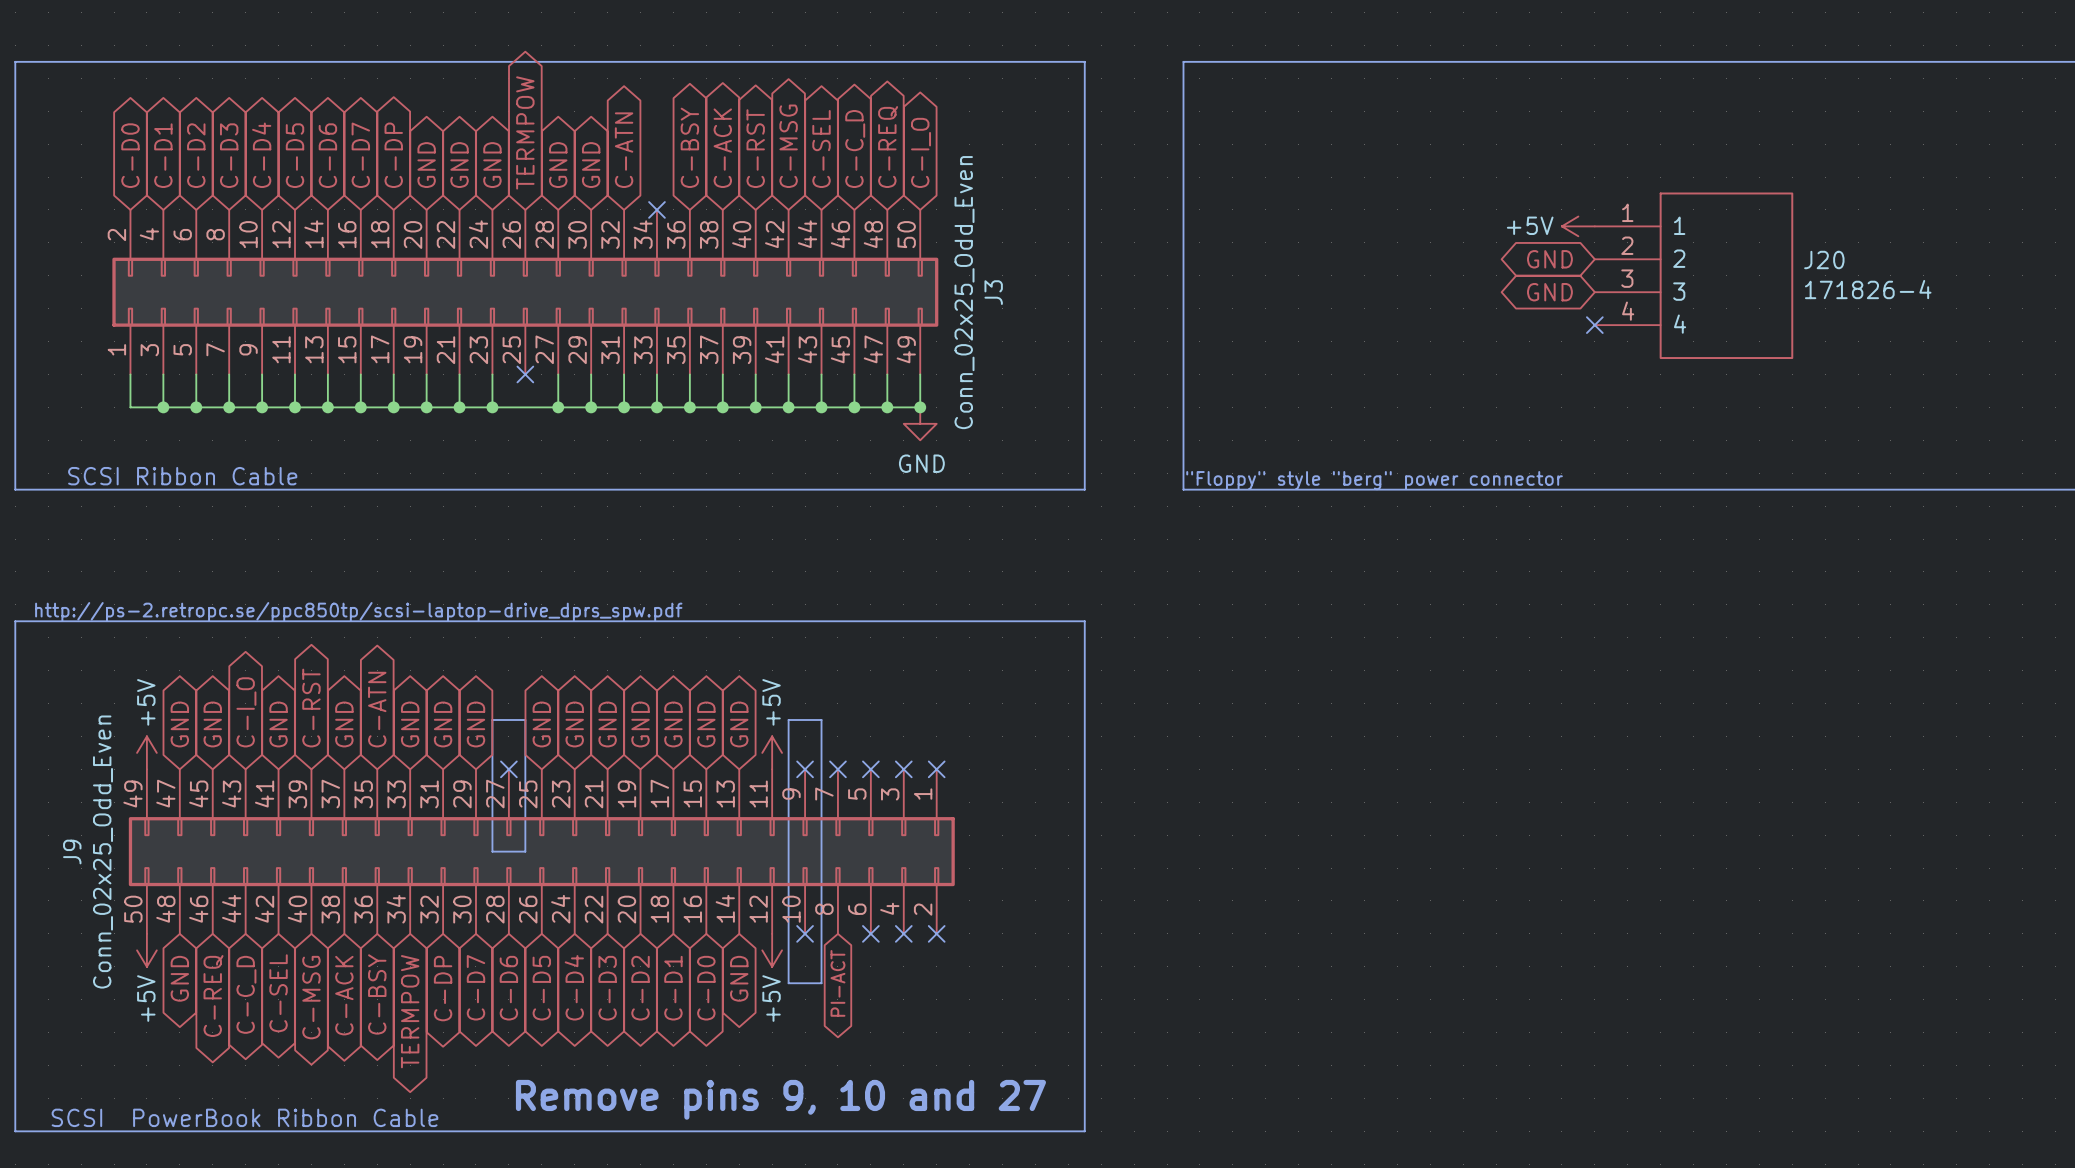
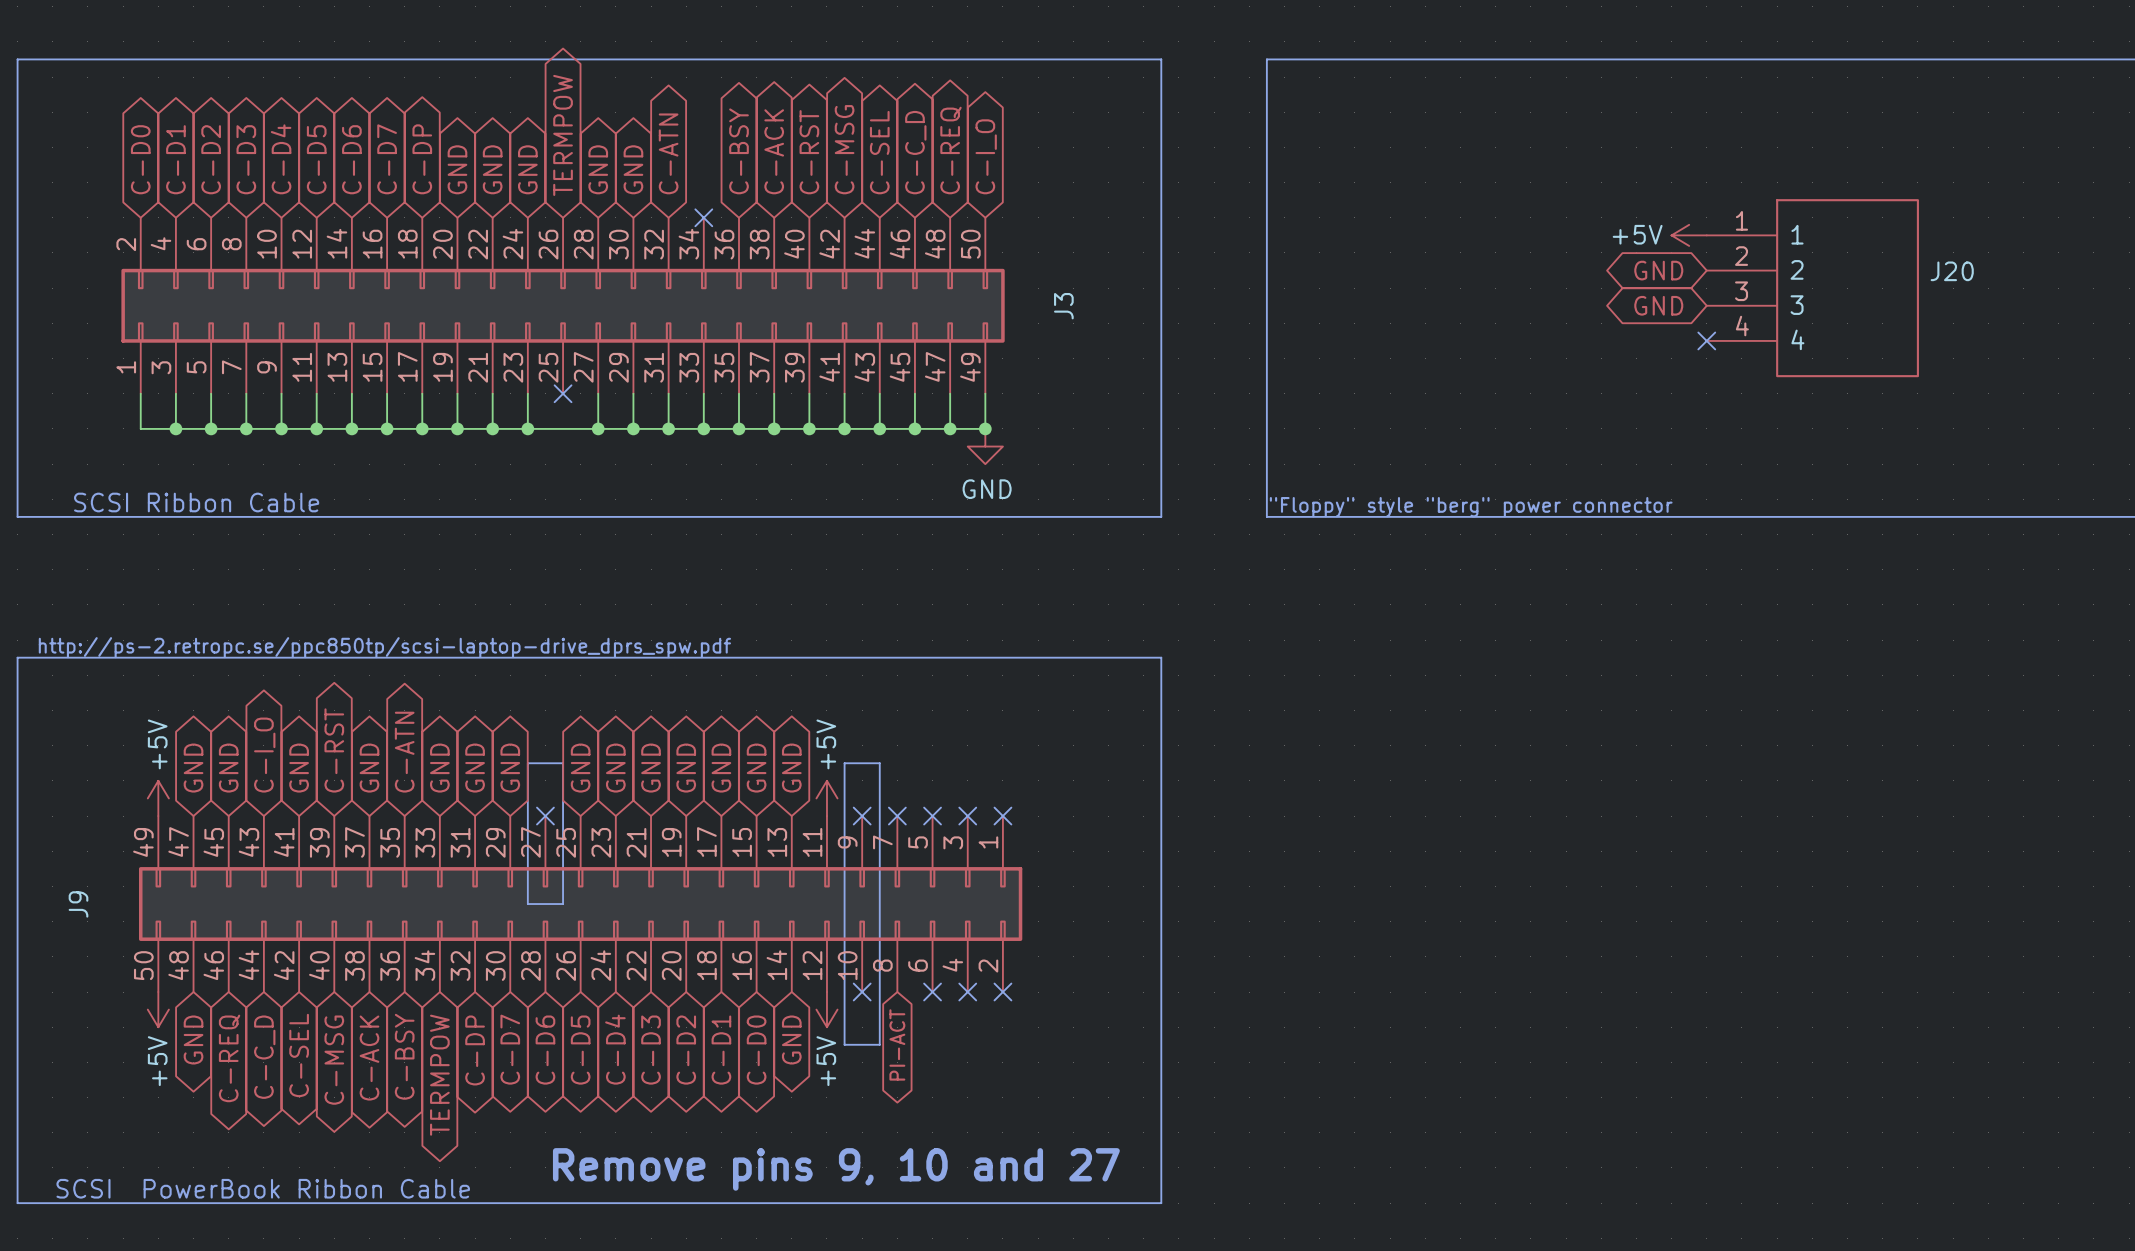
J20 value: 171826-4 (1868, 289) -> none
J3 value: Conn_02x25_Odd_Even (964, 292) -> none
J9 value: Conn_02x25_Odd_Even (102, 852) -> none

